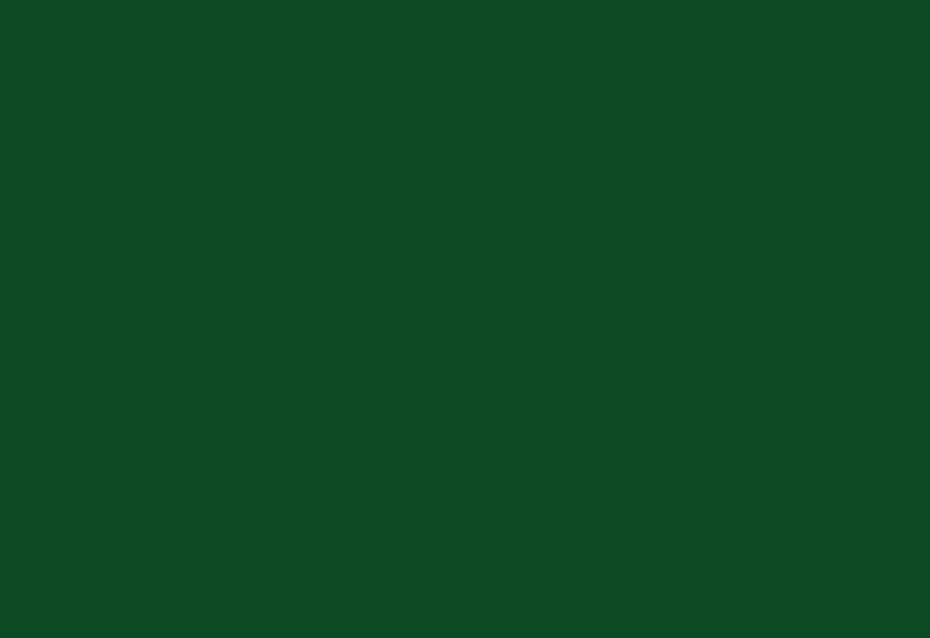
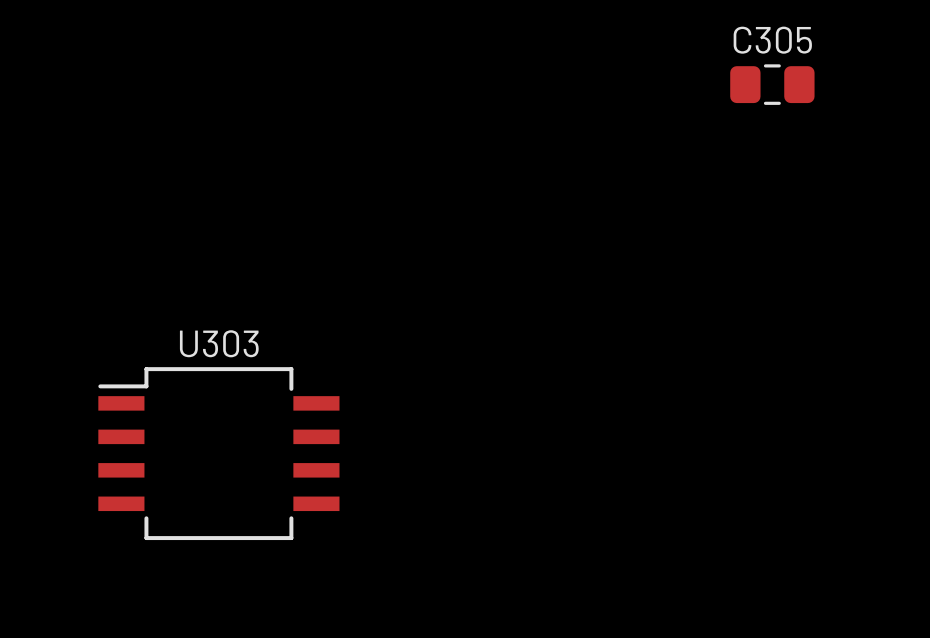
C305: none -> (772, 84)
U303: none -> (218, 453)

